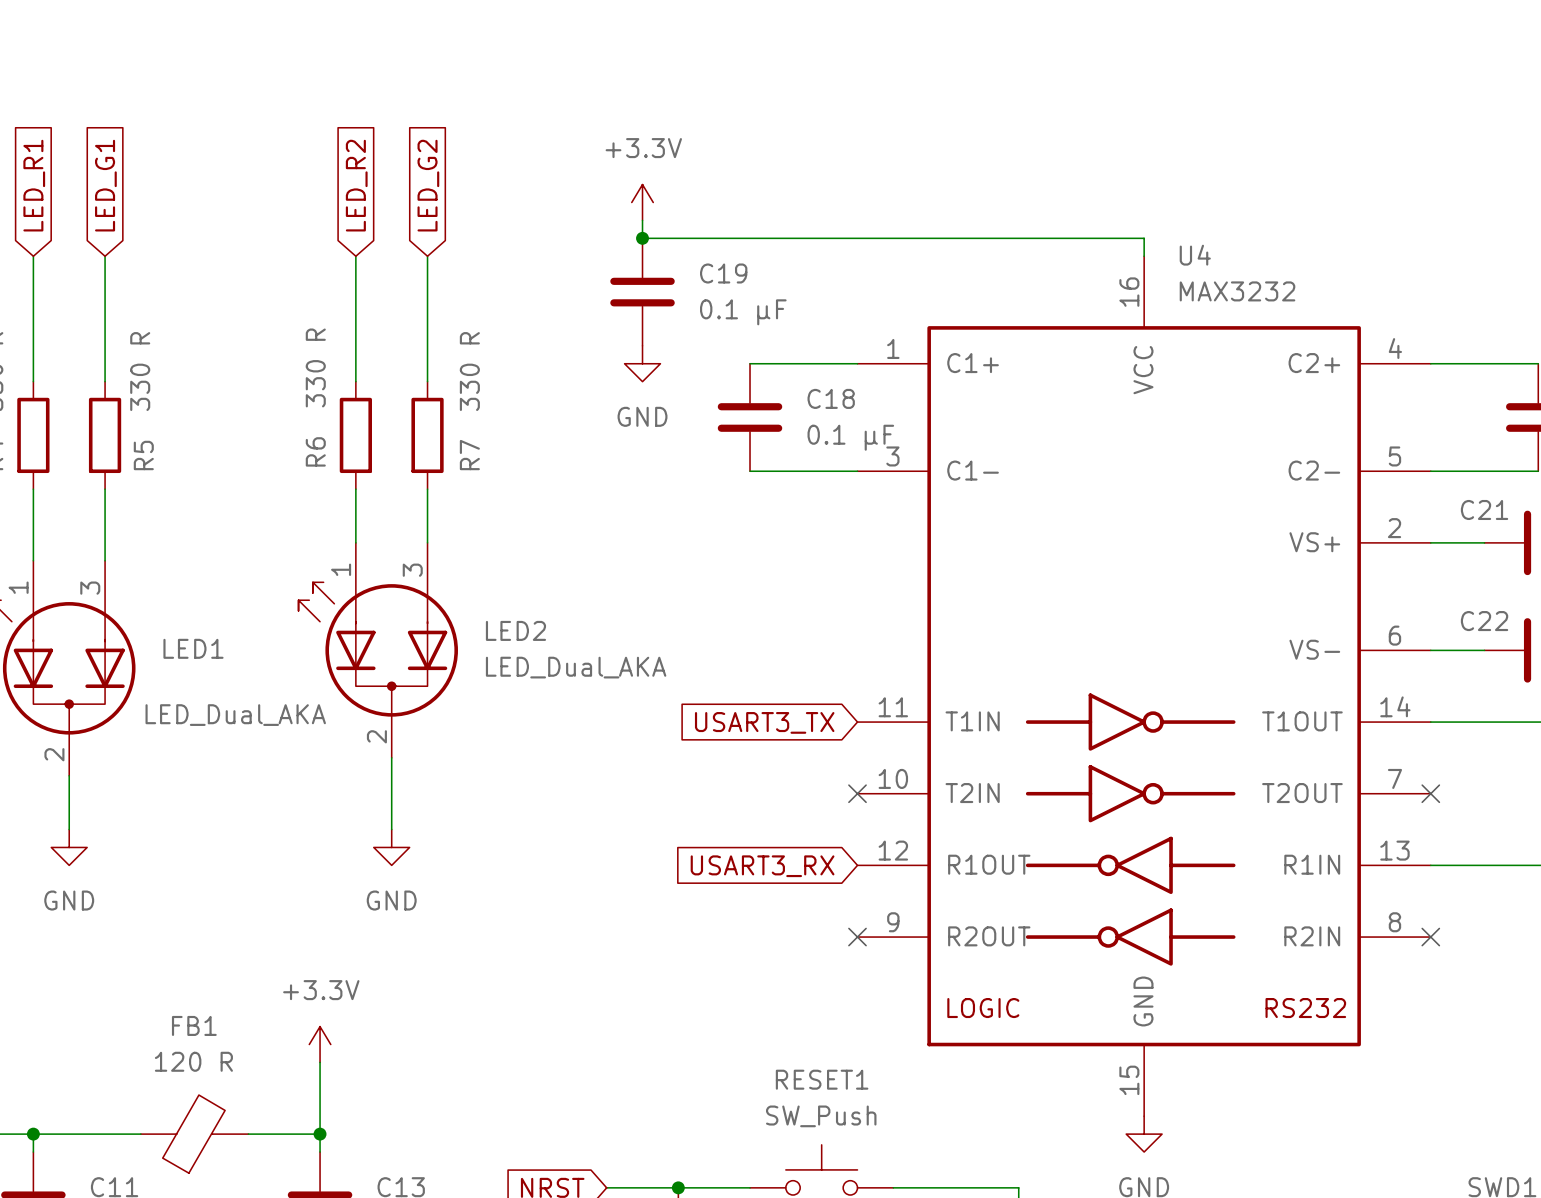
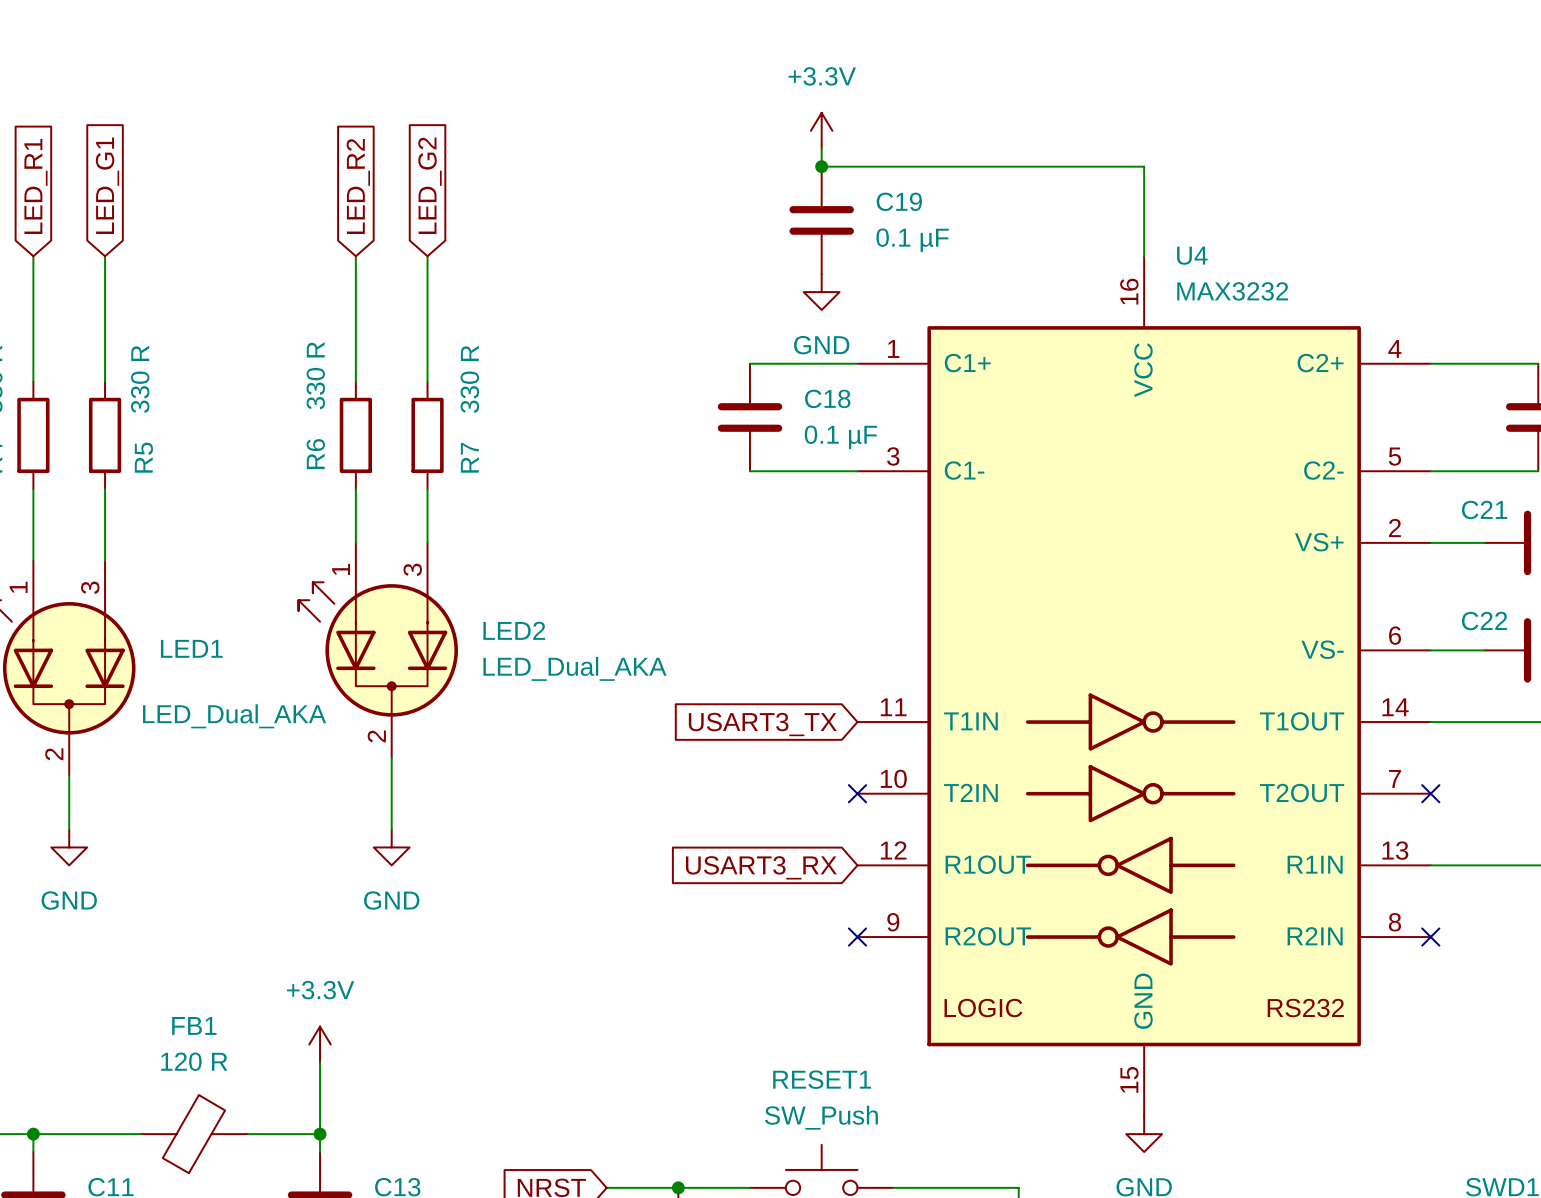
junction: none -> (821, 166)
power symbol position: +3.3V (642, 202) -> +3.3V (821, 130)
wire: (642, 220) (642, 238) (1144, 238) -> (821, 148) (821, 166) (1144, 166) (1144, 238)
junction: (642, 238) -> none
C19 position: (642, 292) -> (821, 220)
power symbol position: GND (642, 363) -> GND (821, 292)

